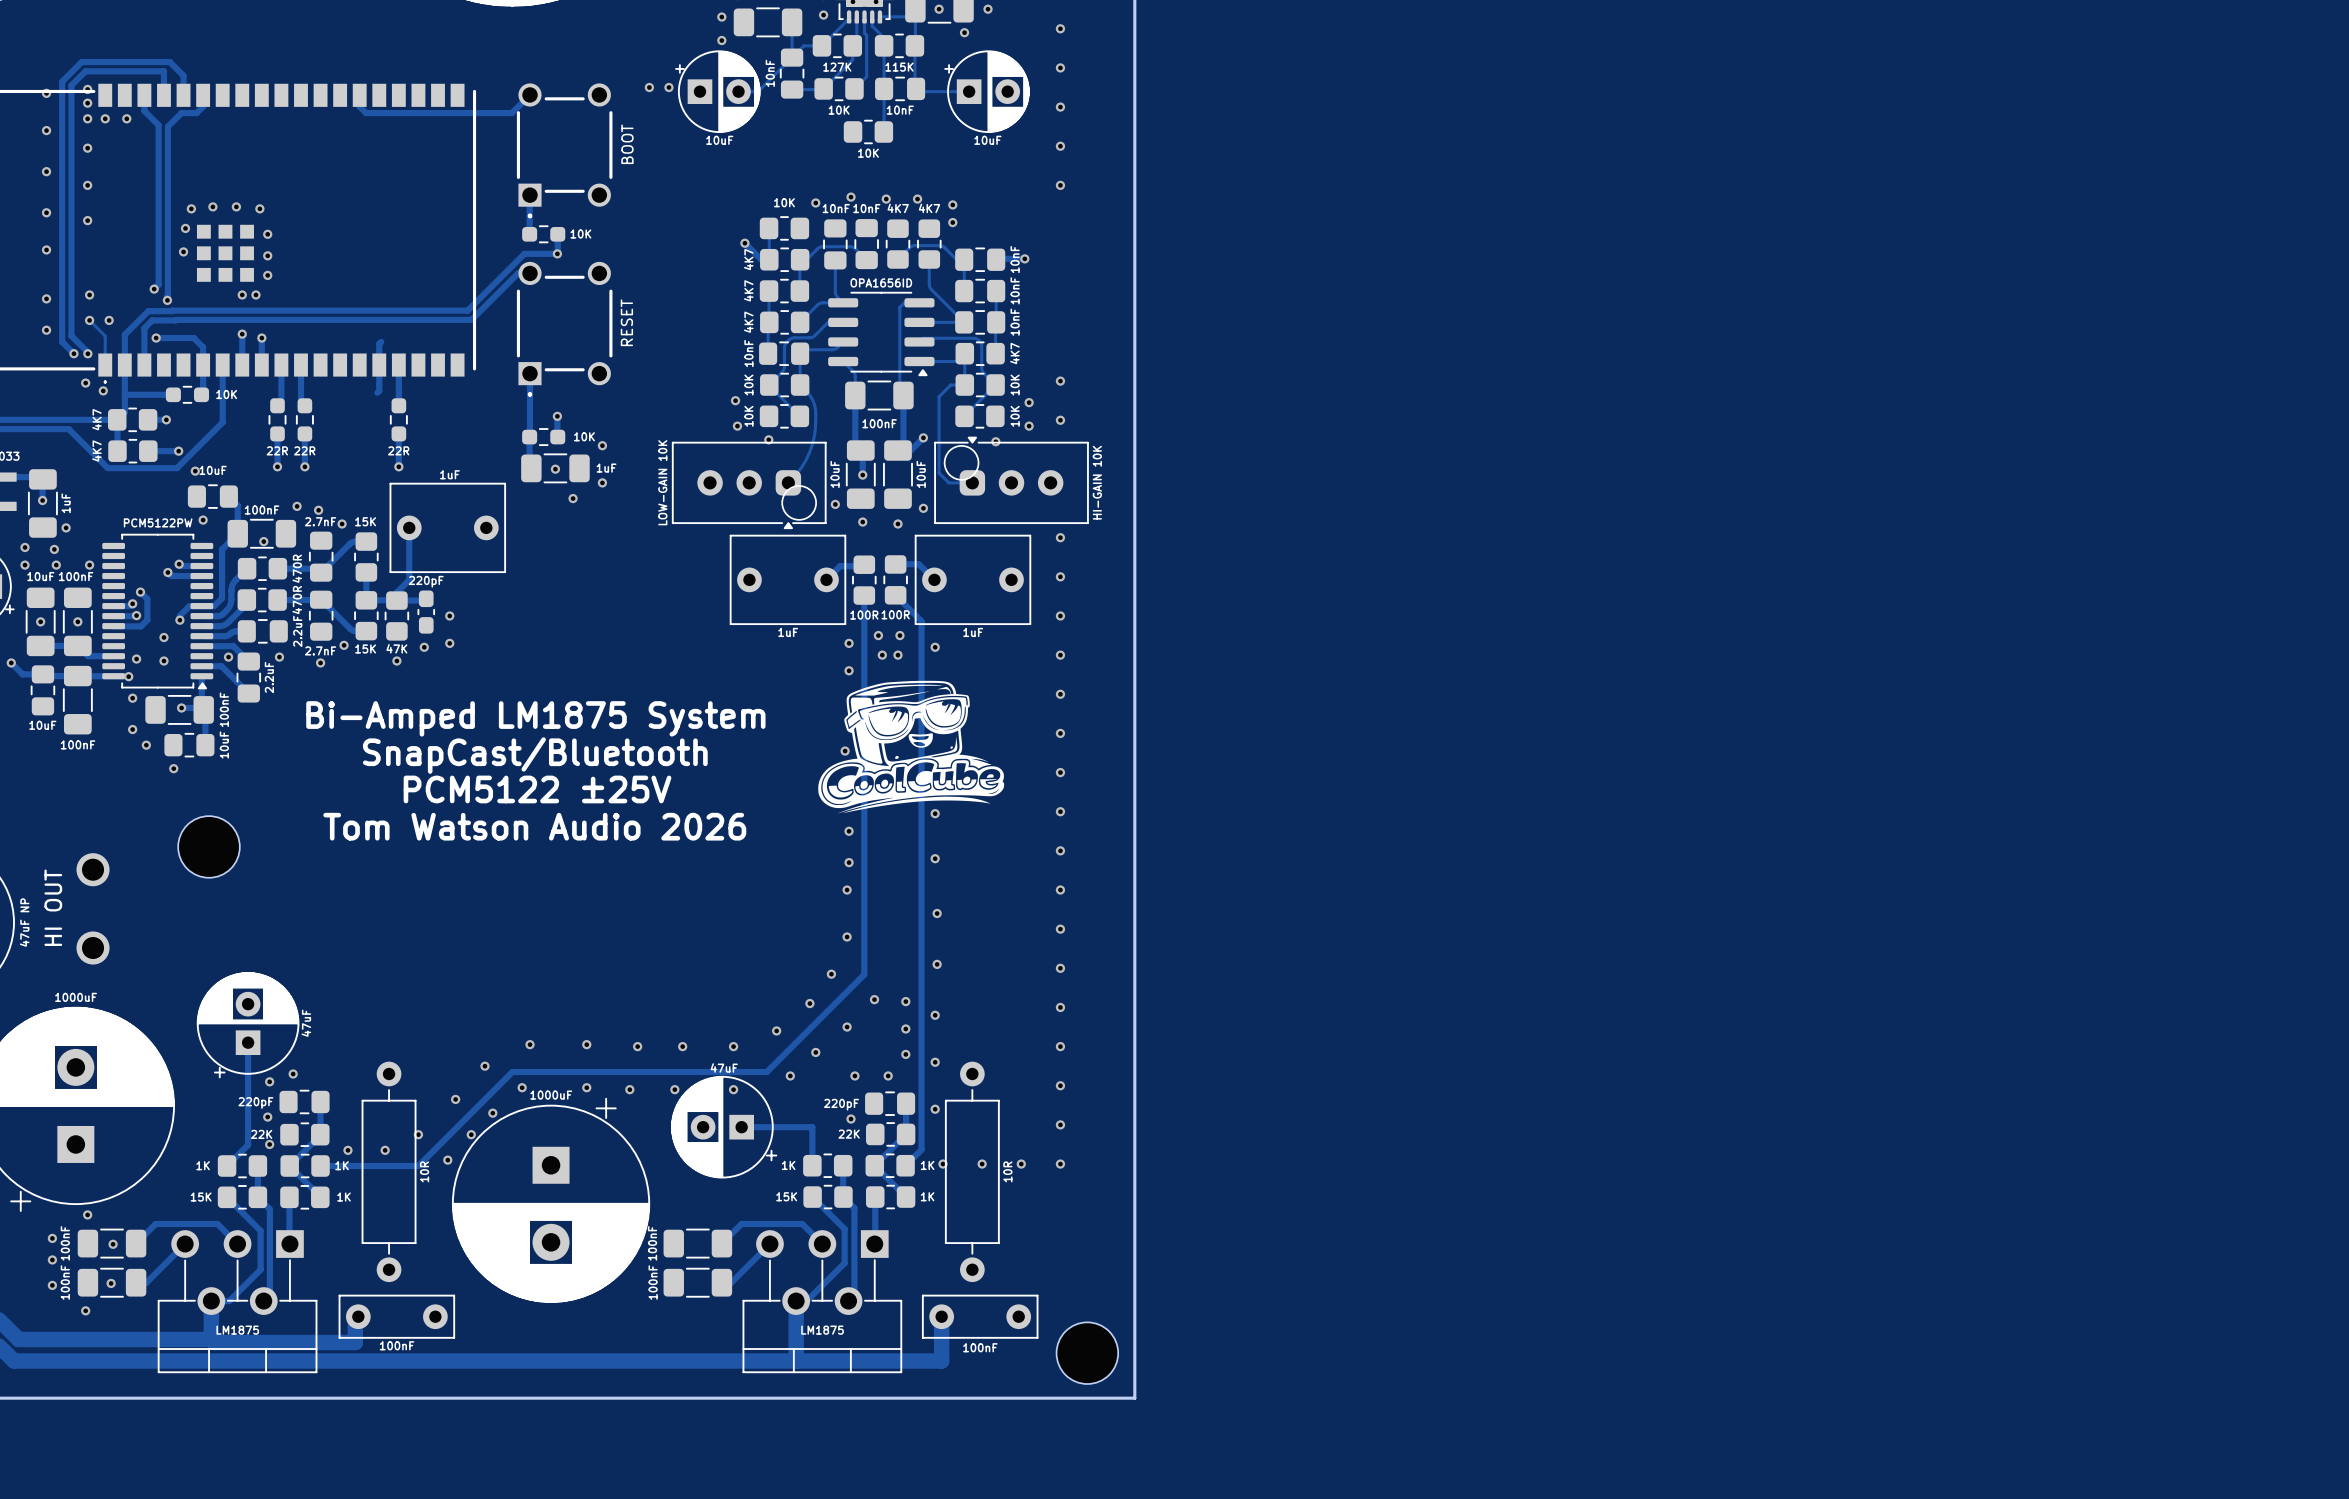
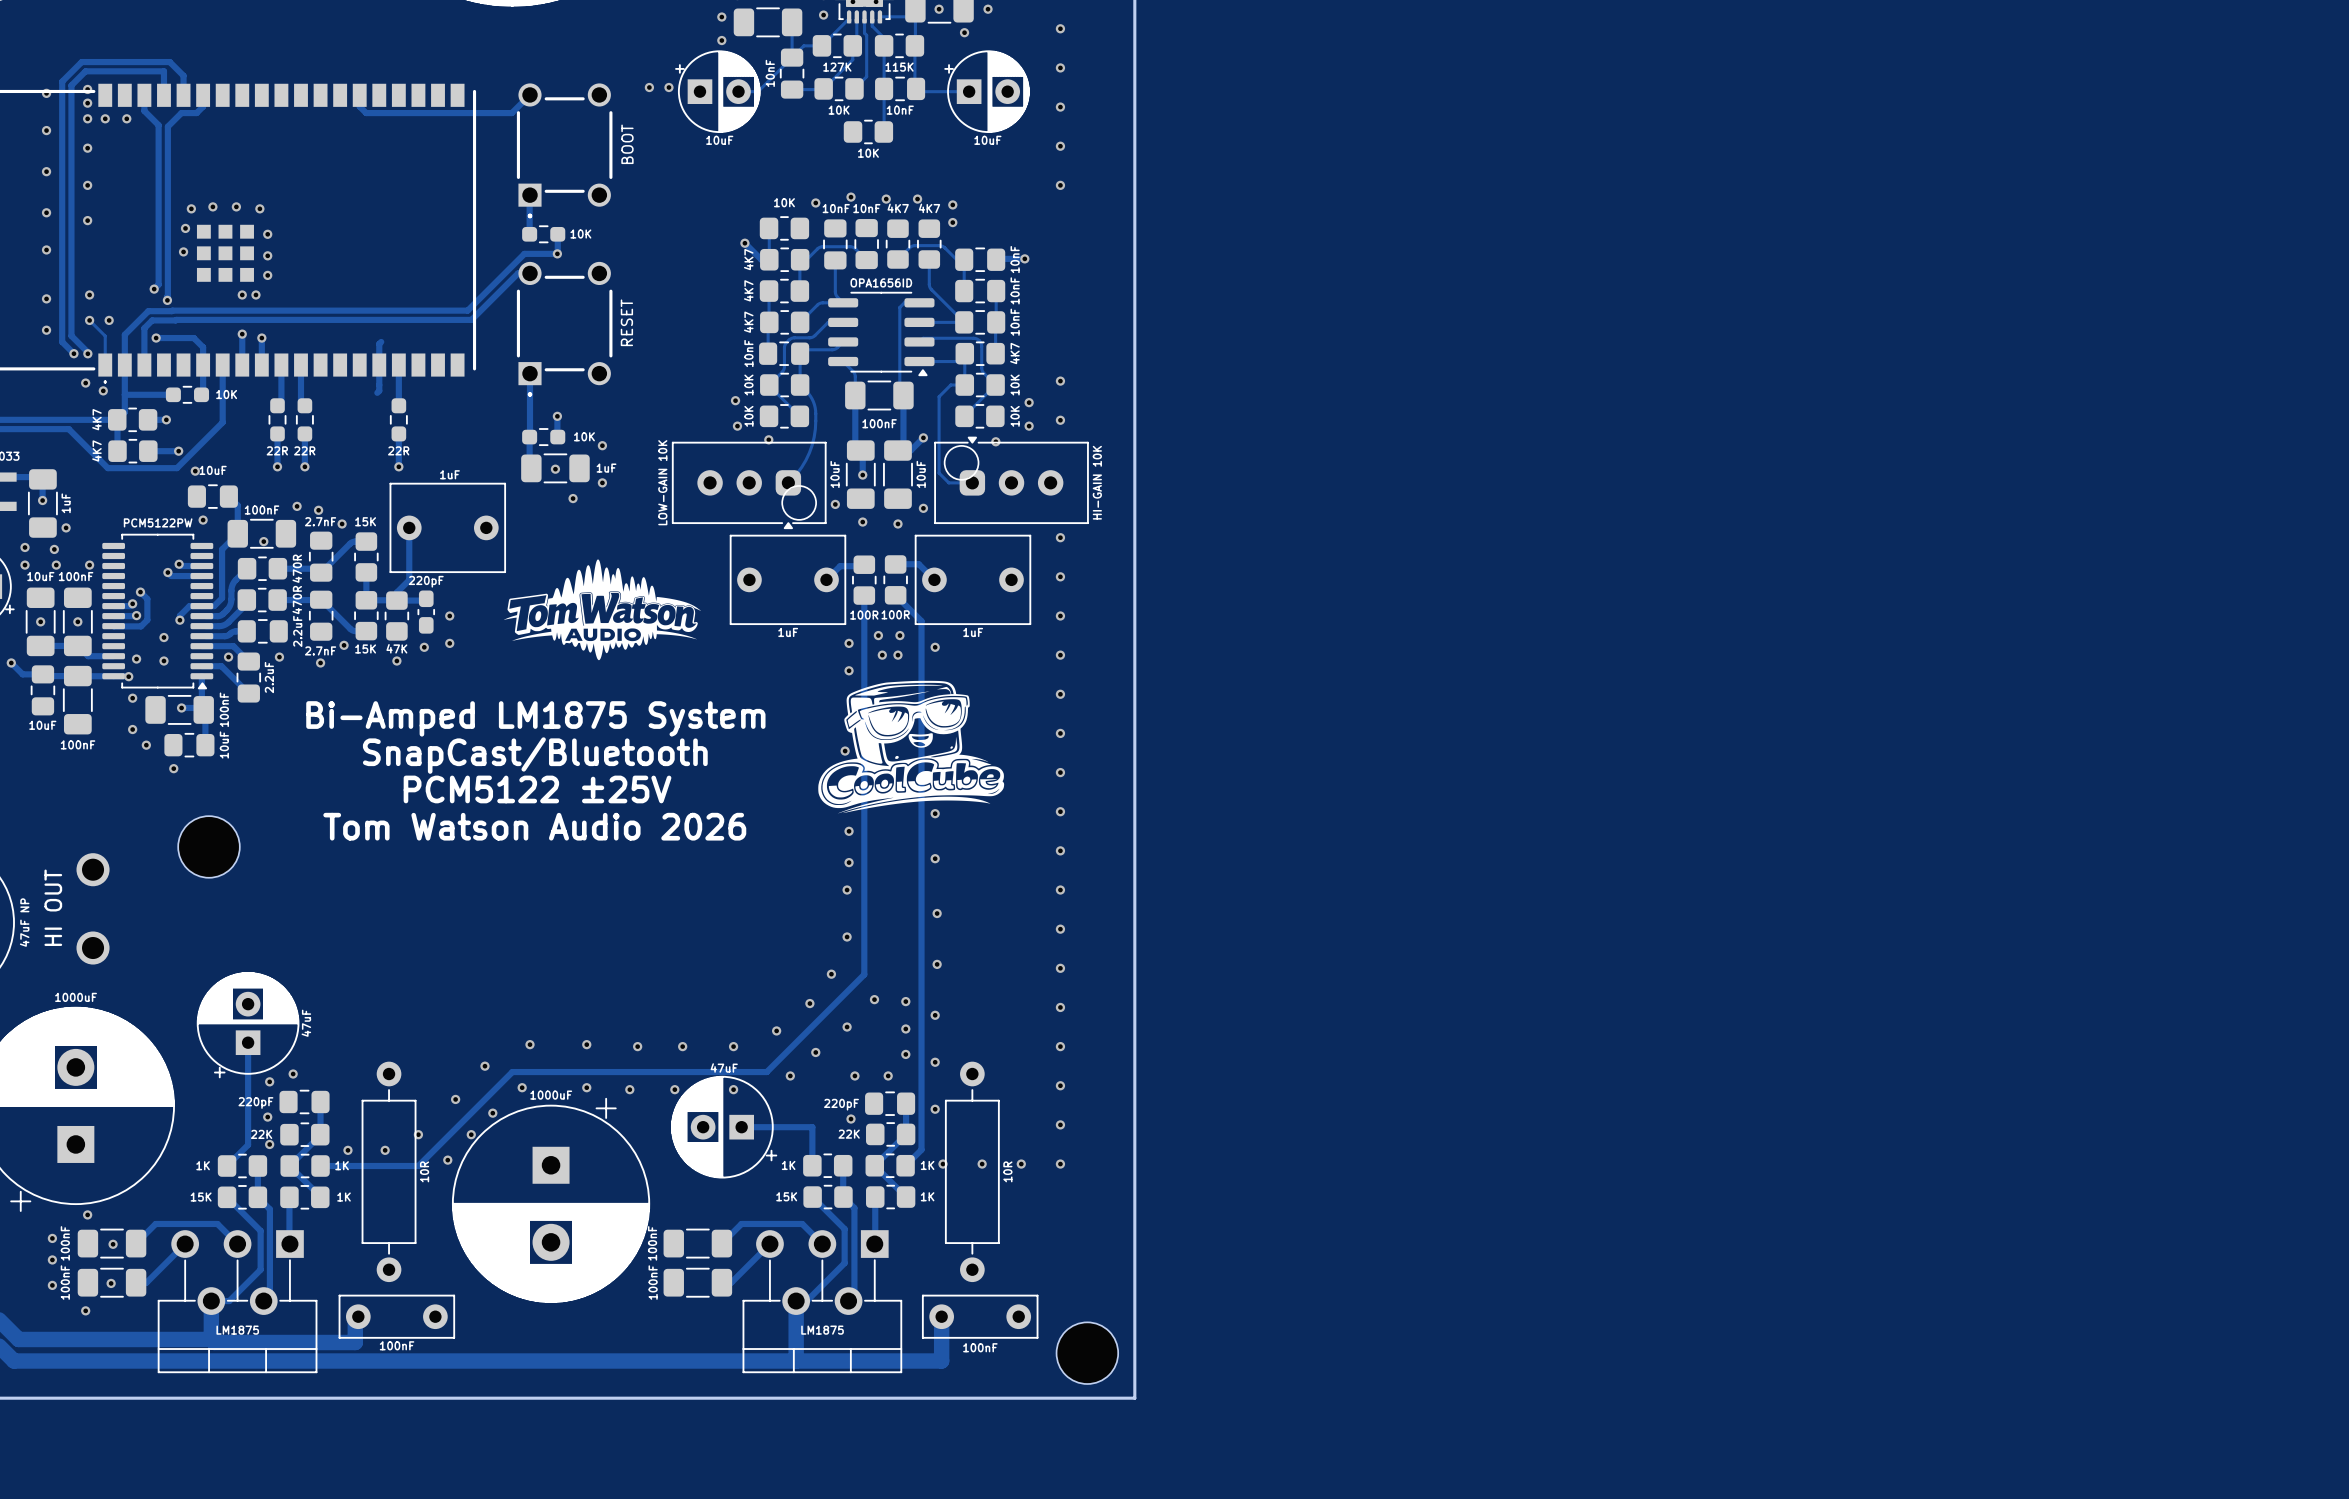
drawing: none -> [503, 559, 702, 661]

